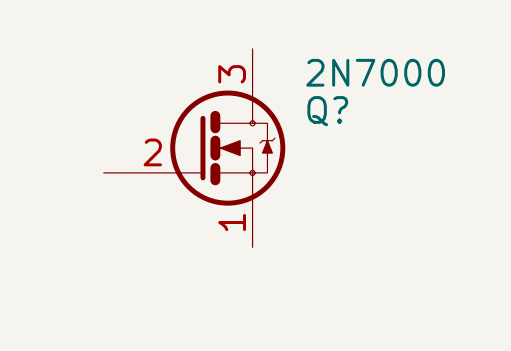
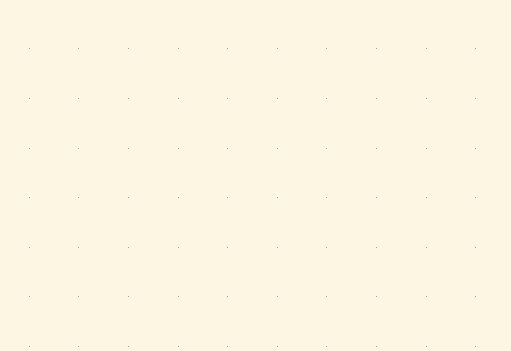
Q?: 2N7000 (194, 148) -> none

